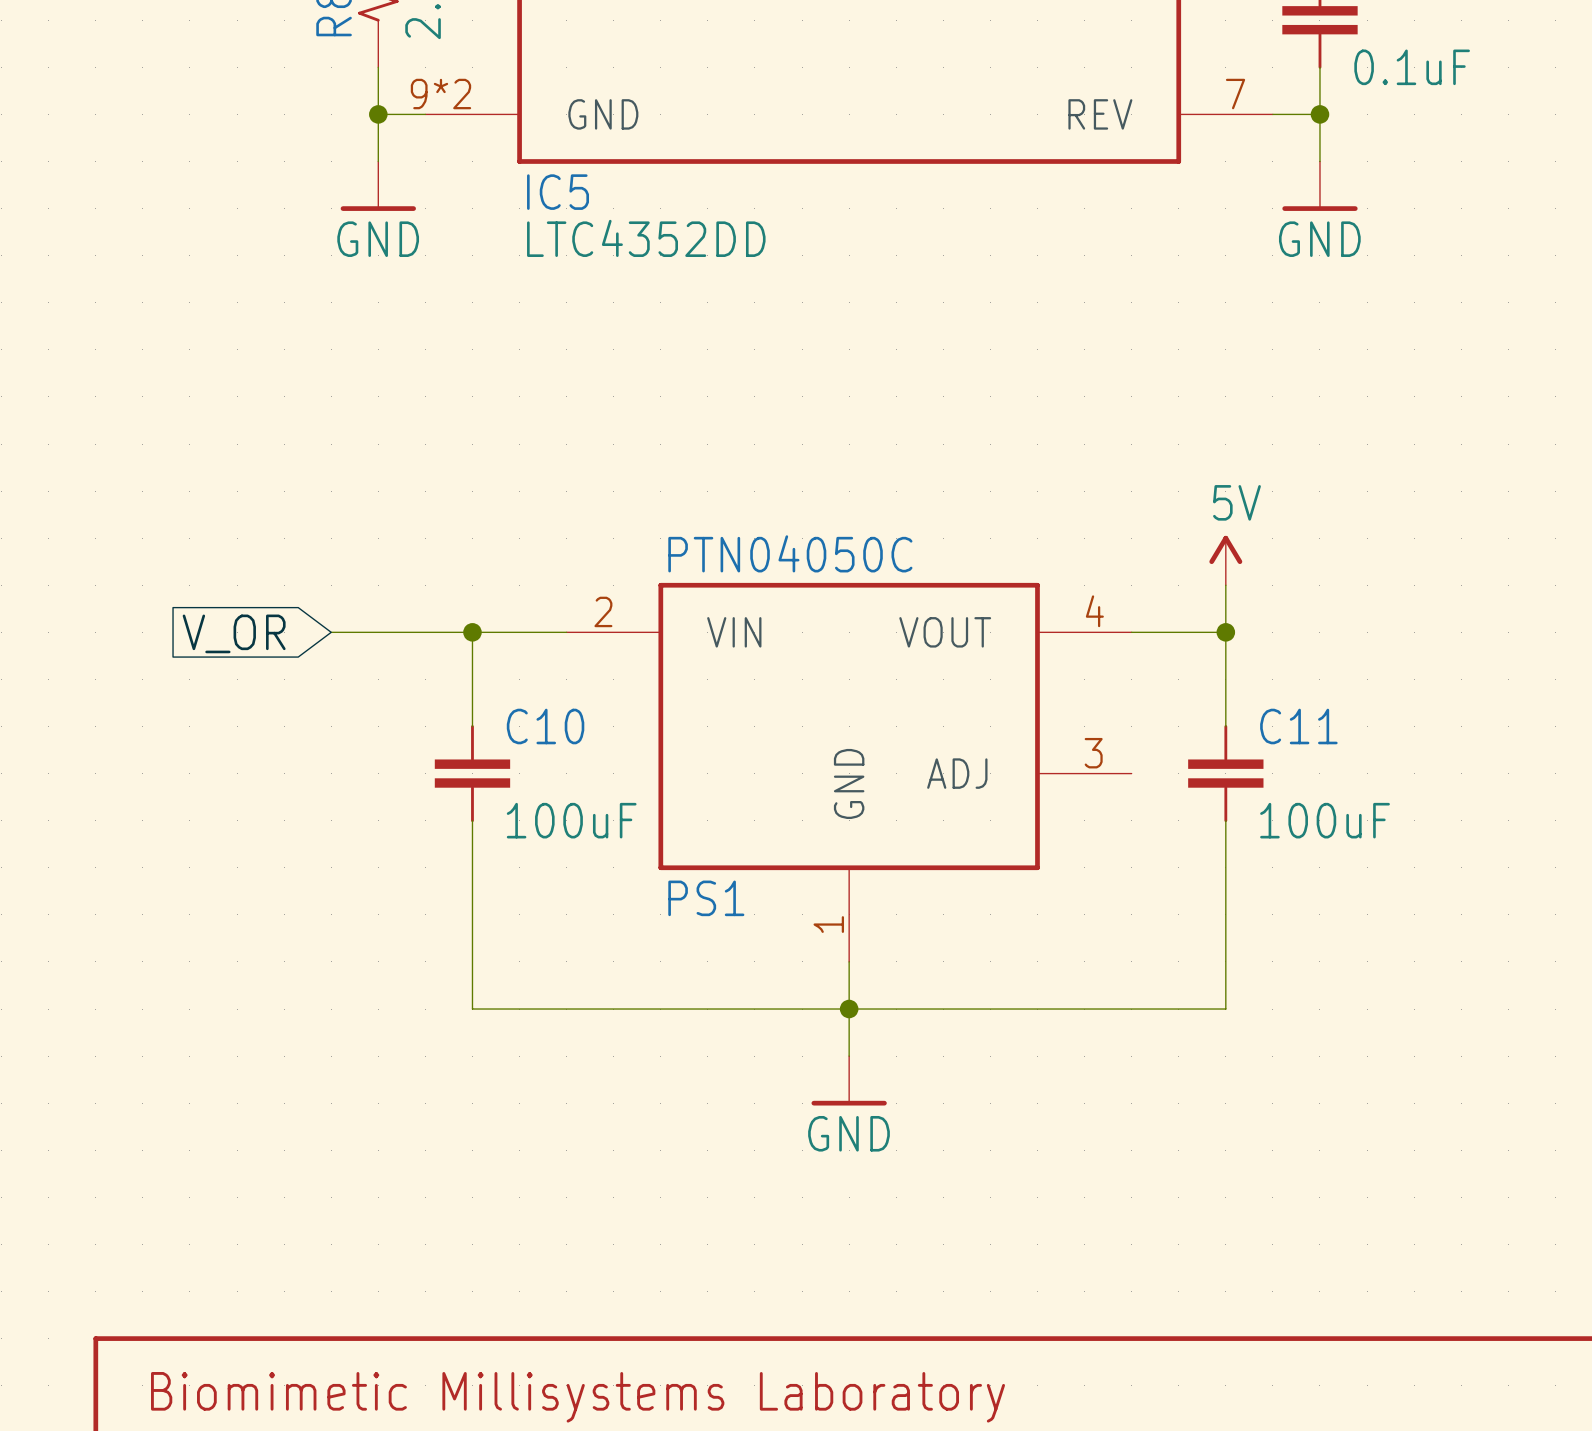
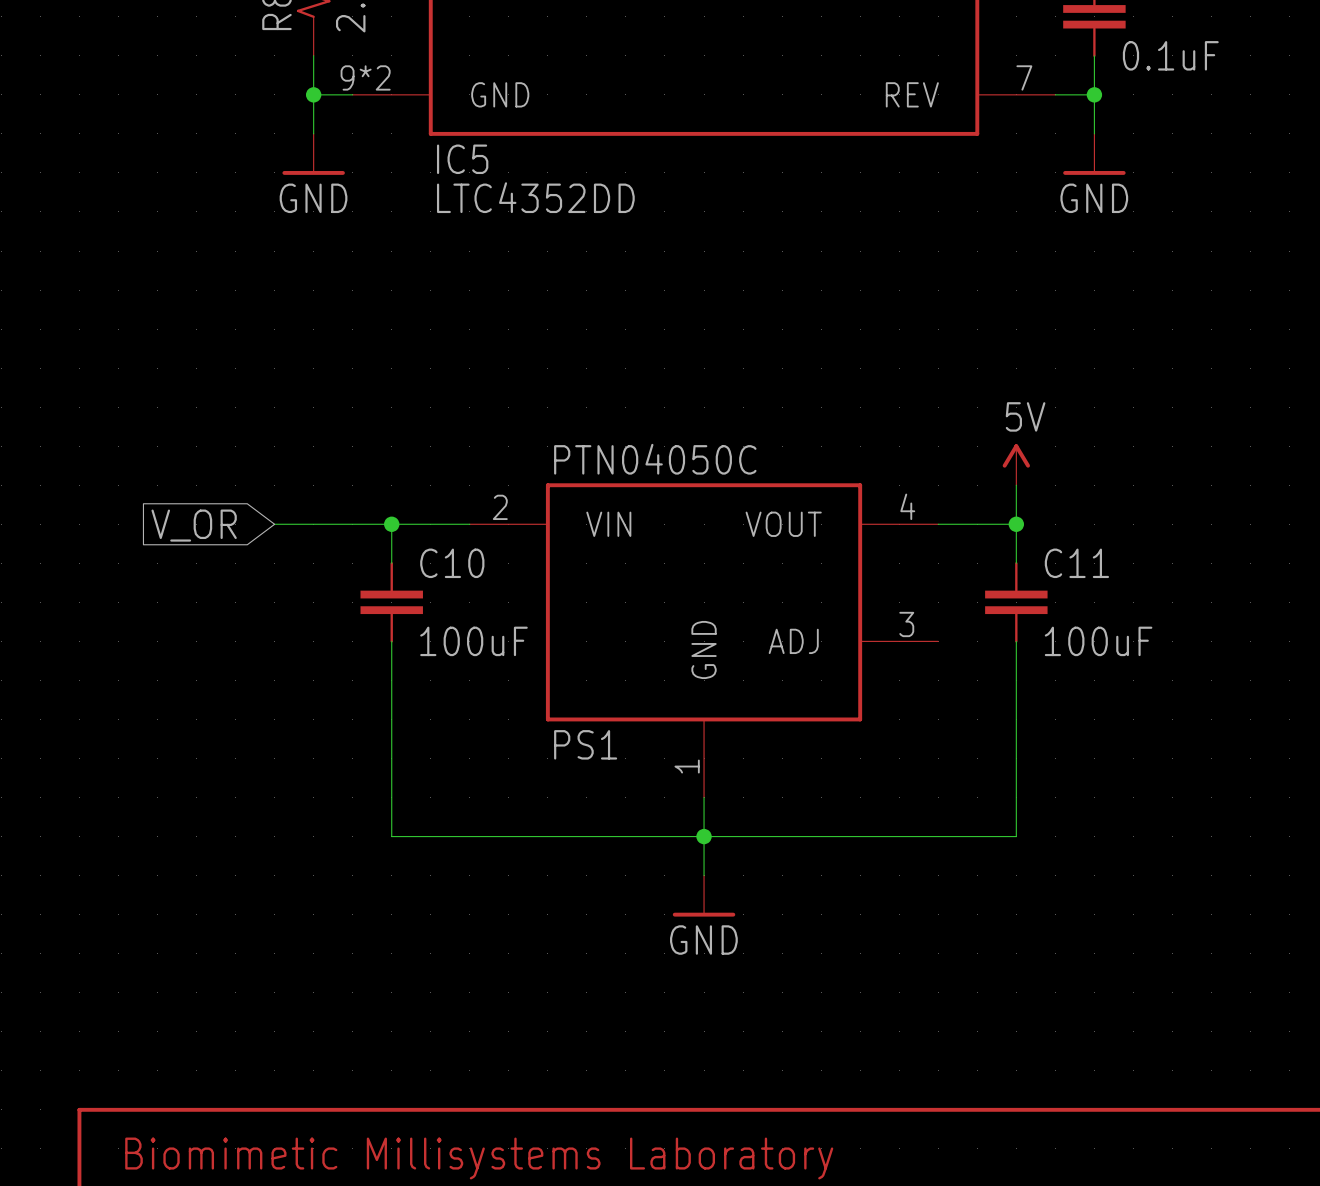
C10 position: (472, 773) -> (391, 602)
C11 position: (1225, 773) -> (1016, 602)

